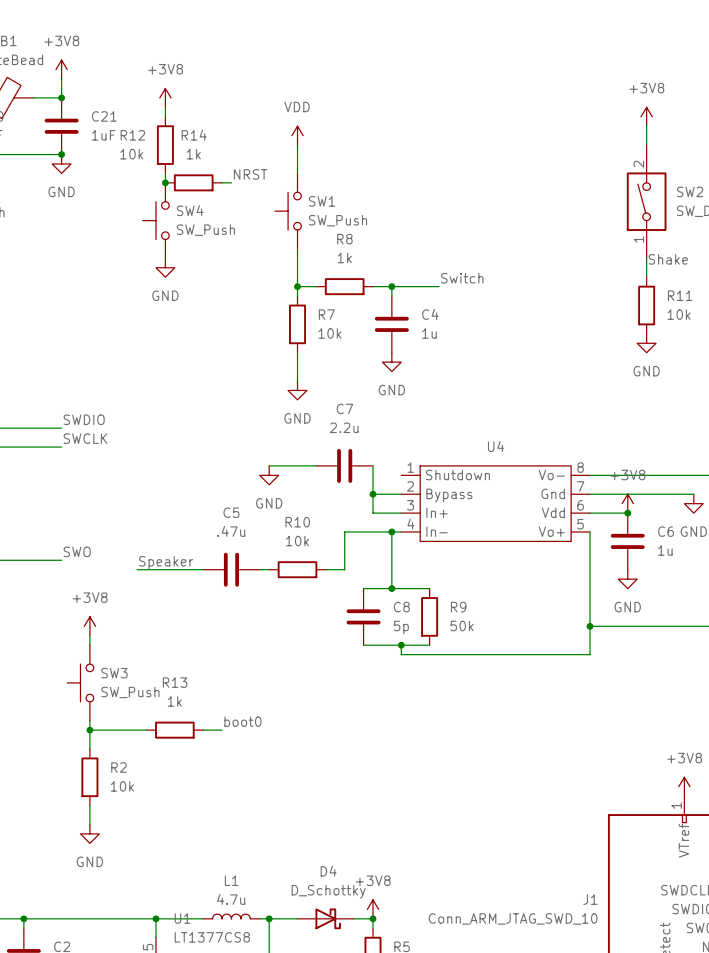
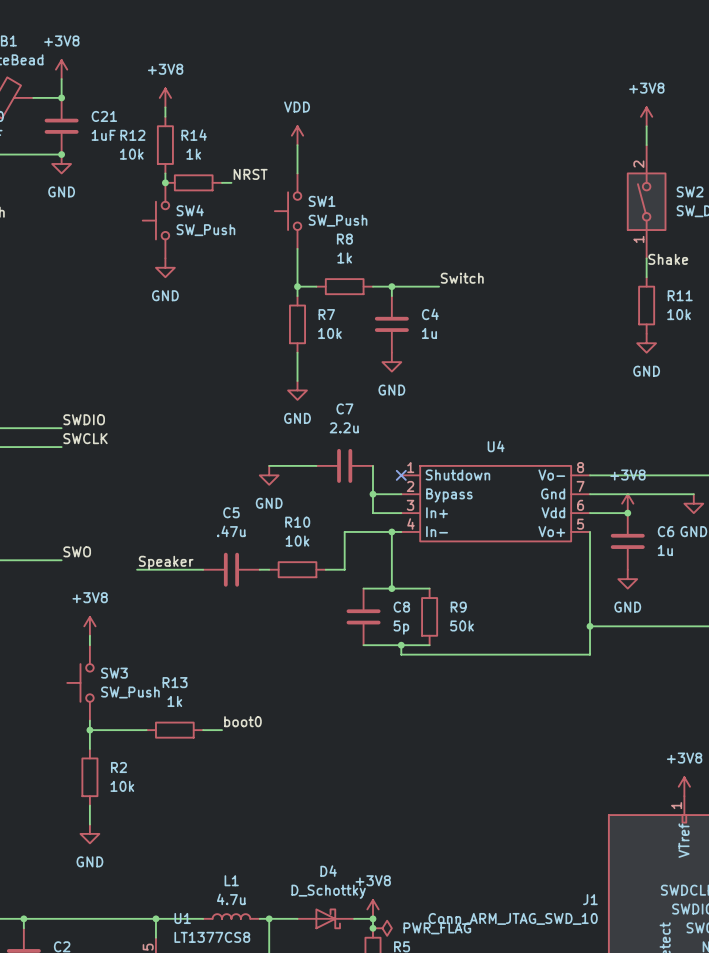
no-connect mark: none -> (401, 475)
junction: none -> (372, 928)
power symbol: none -> PWR_FLAG (382, 928)

